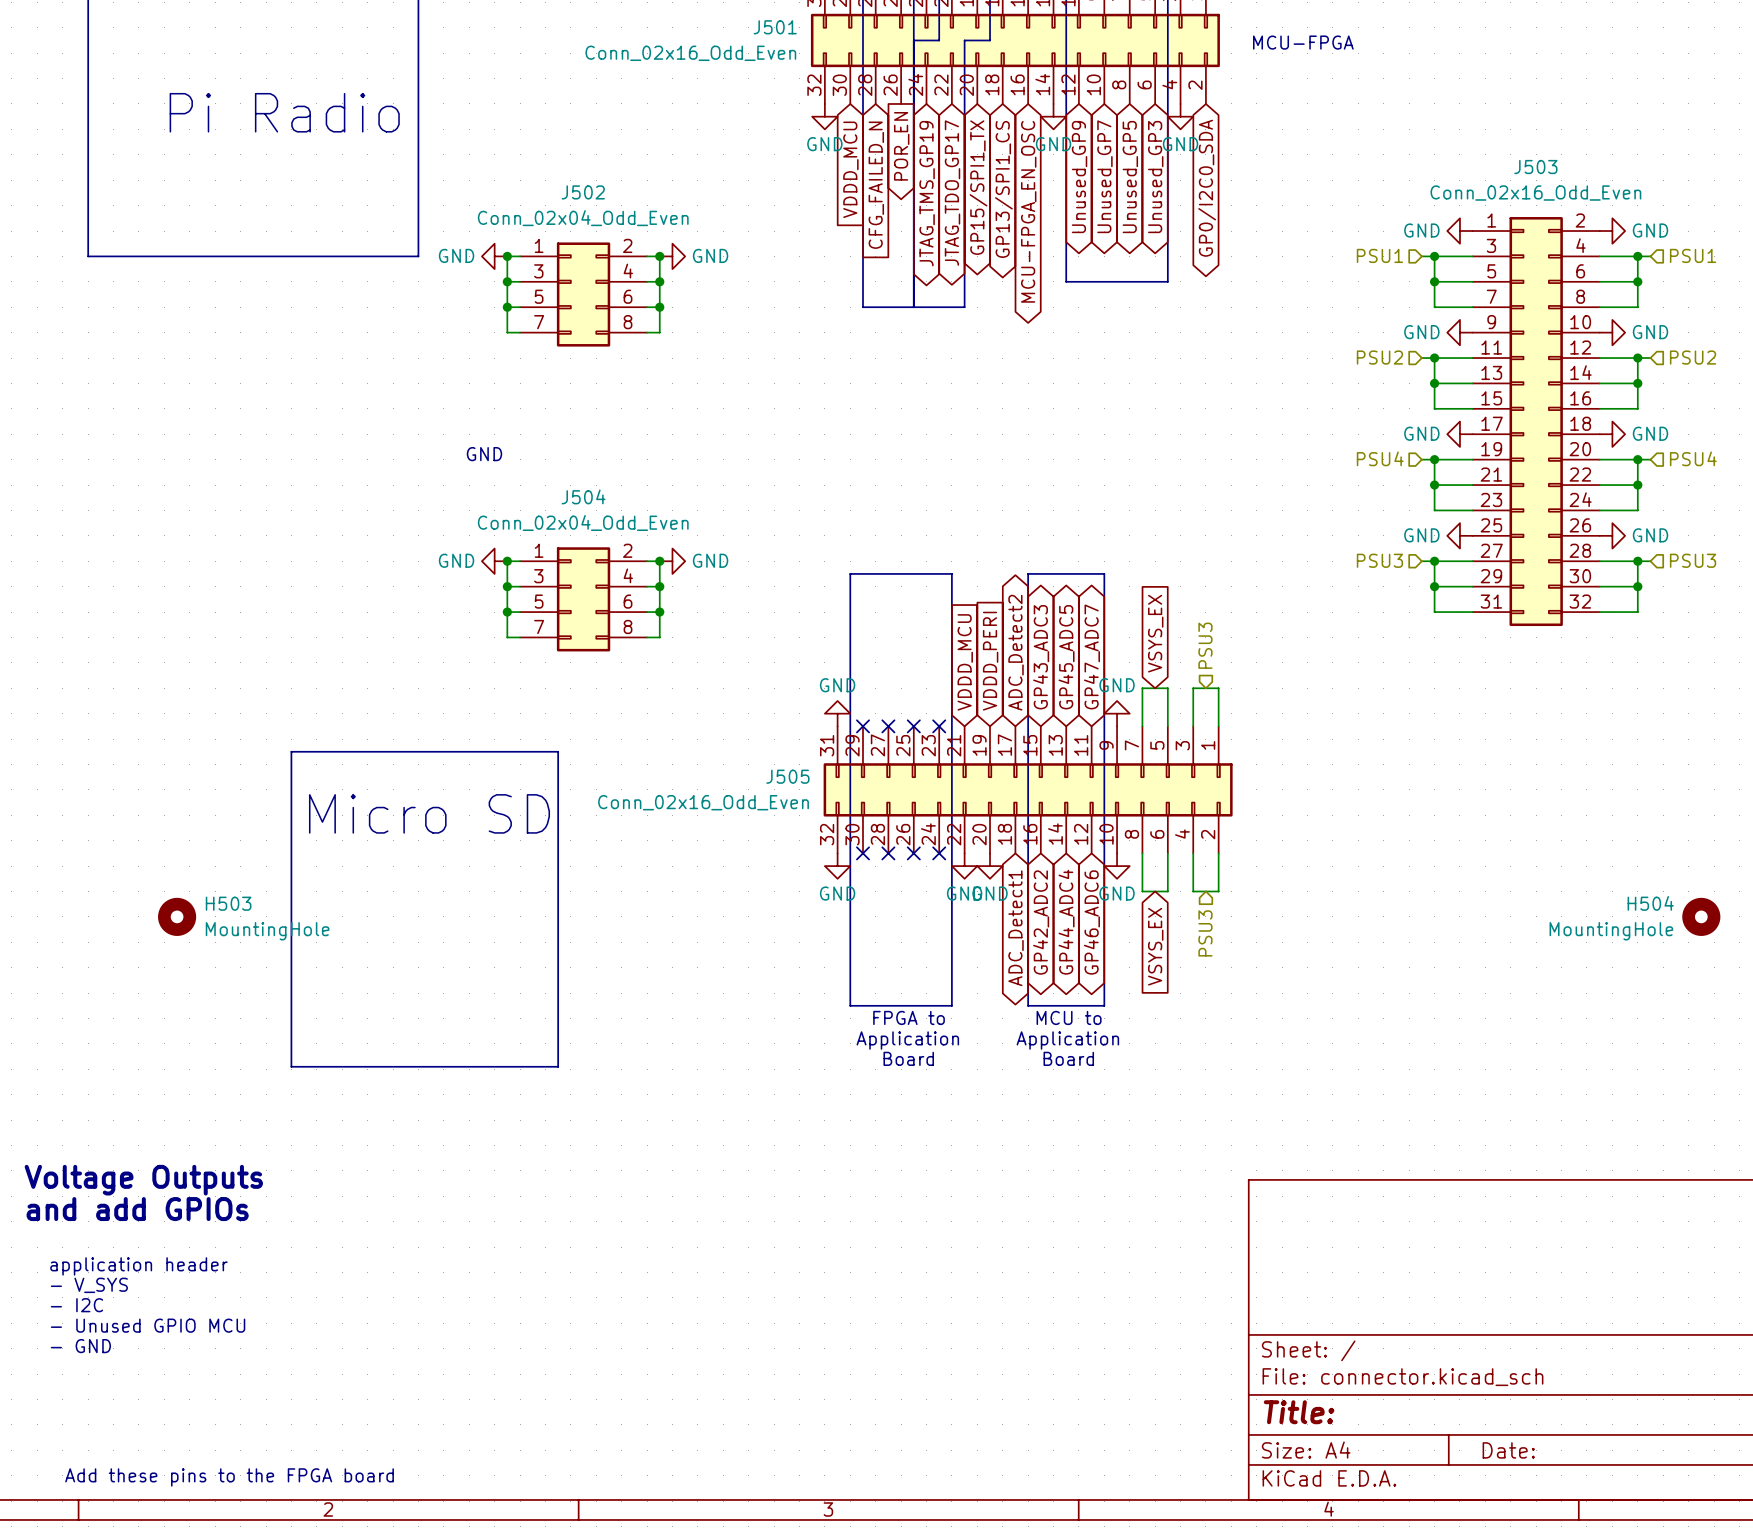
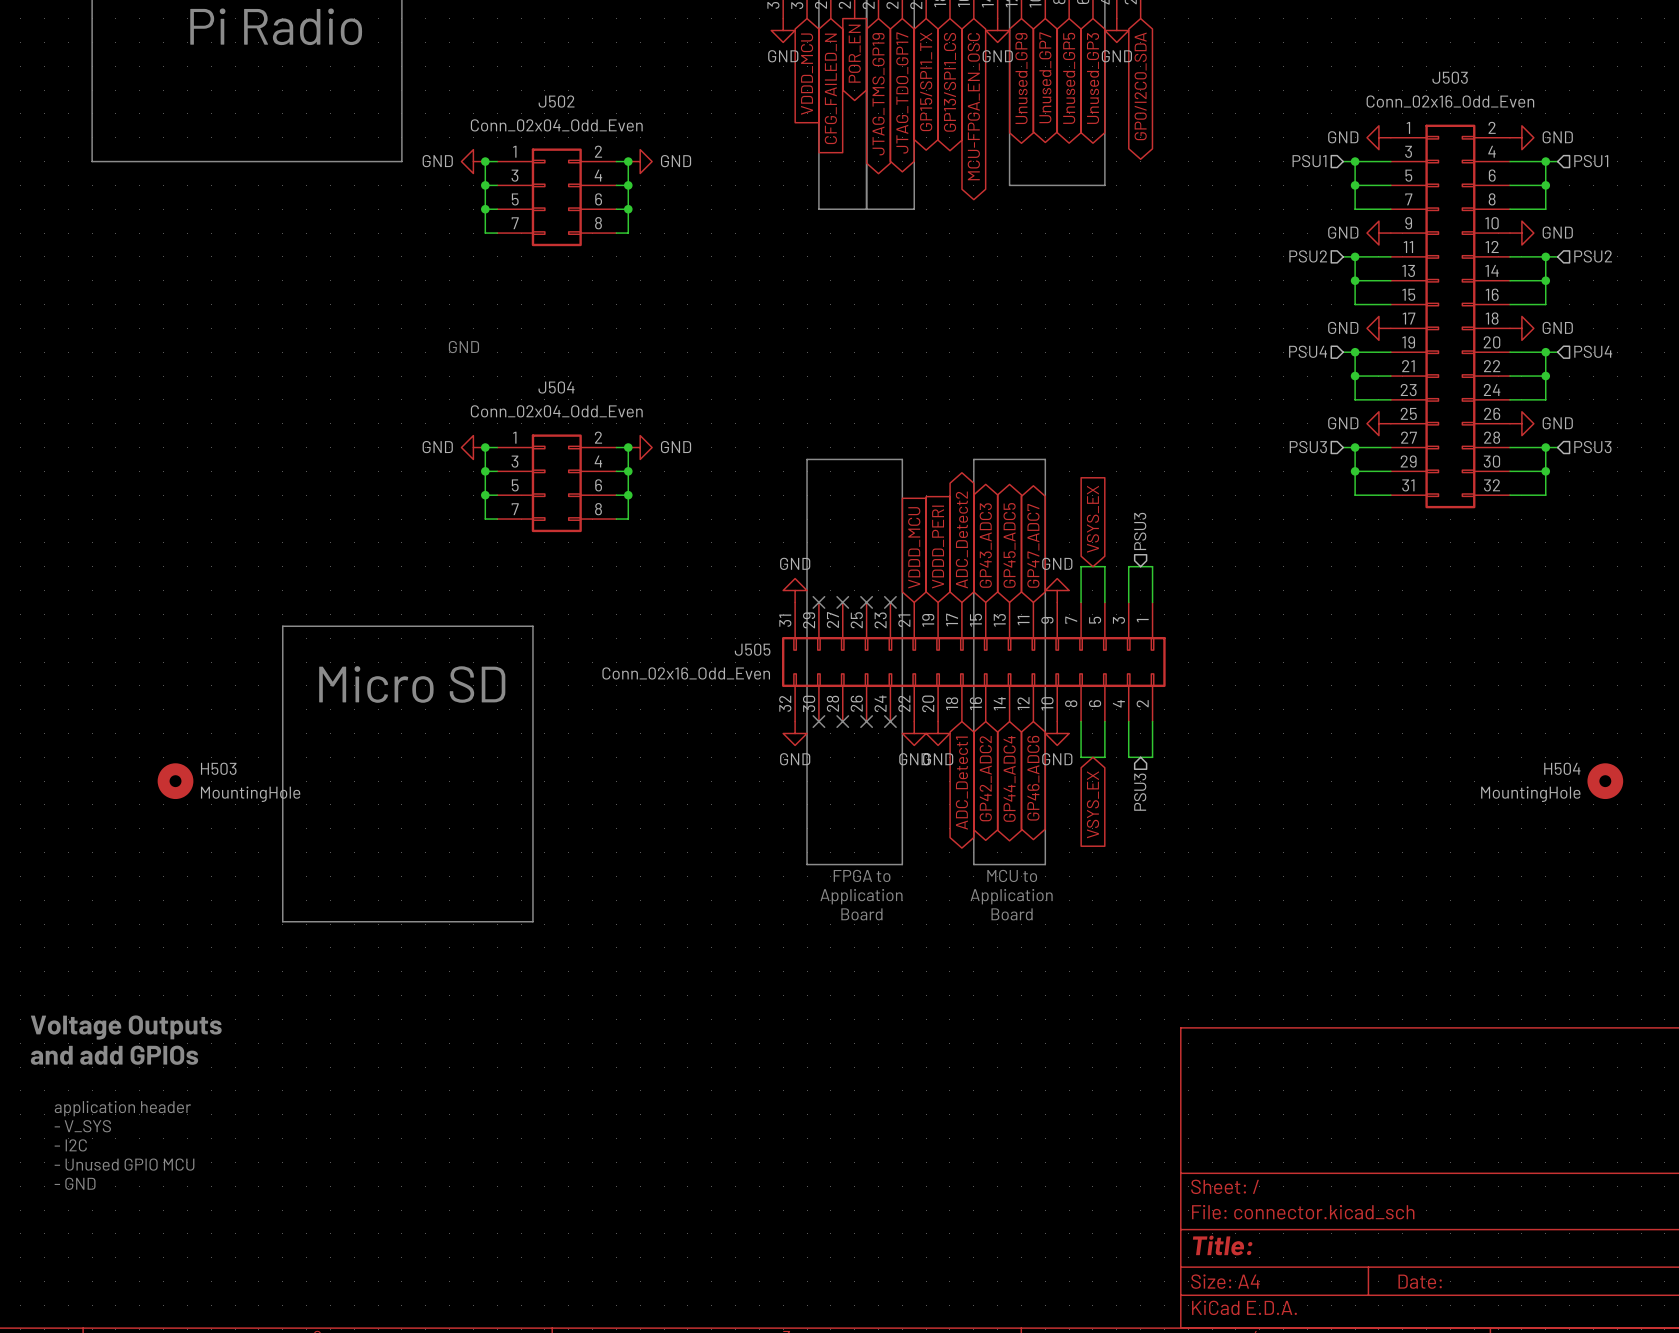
text: Add these pins to the FPGA board (229, 1477) -> none

